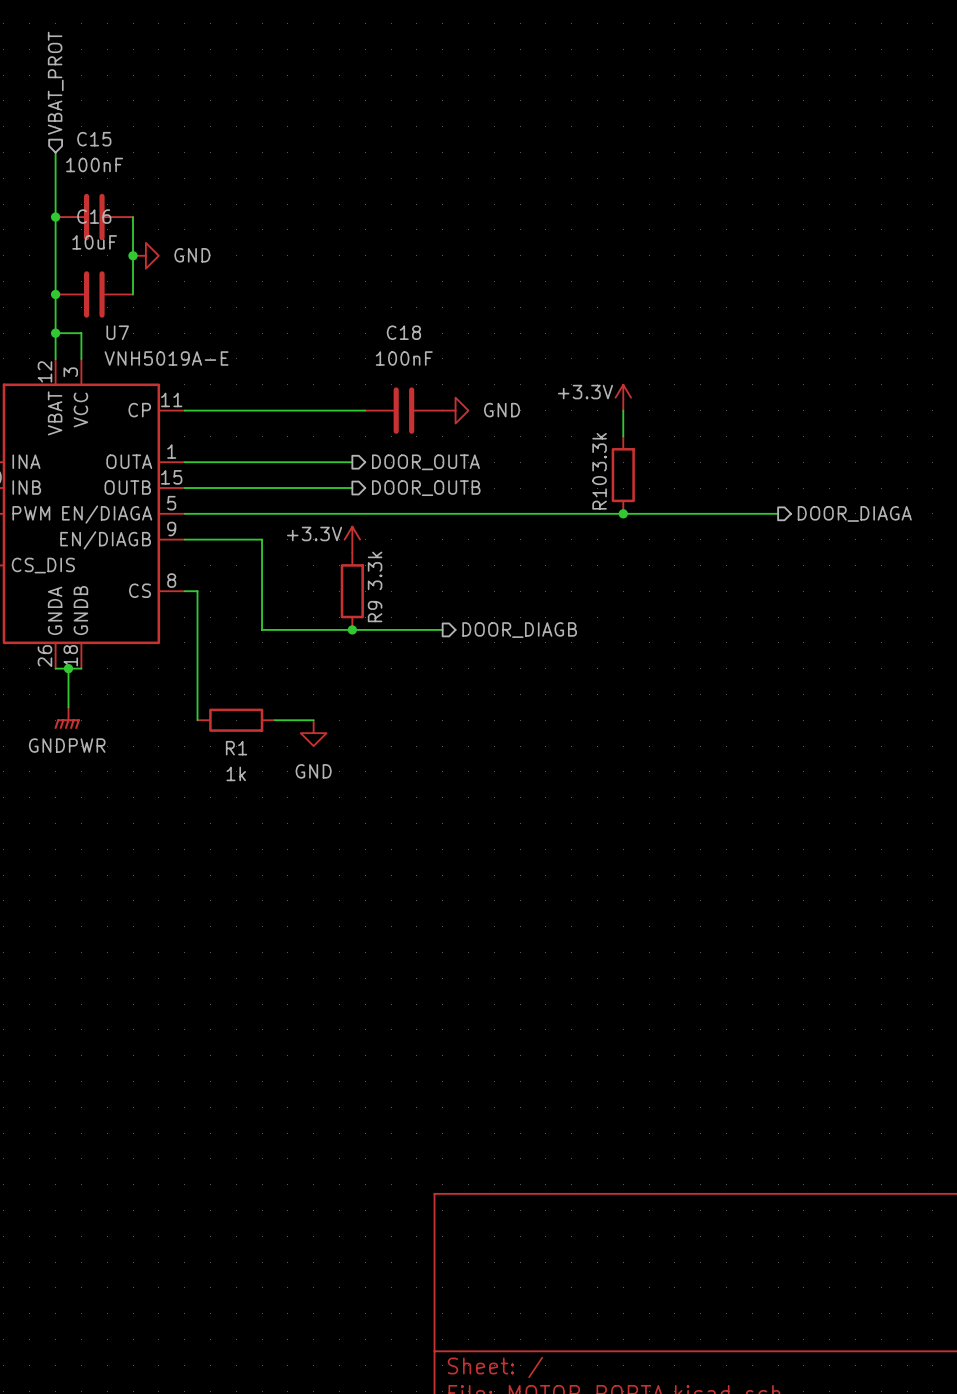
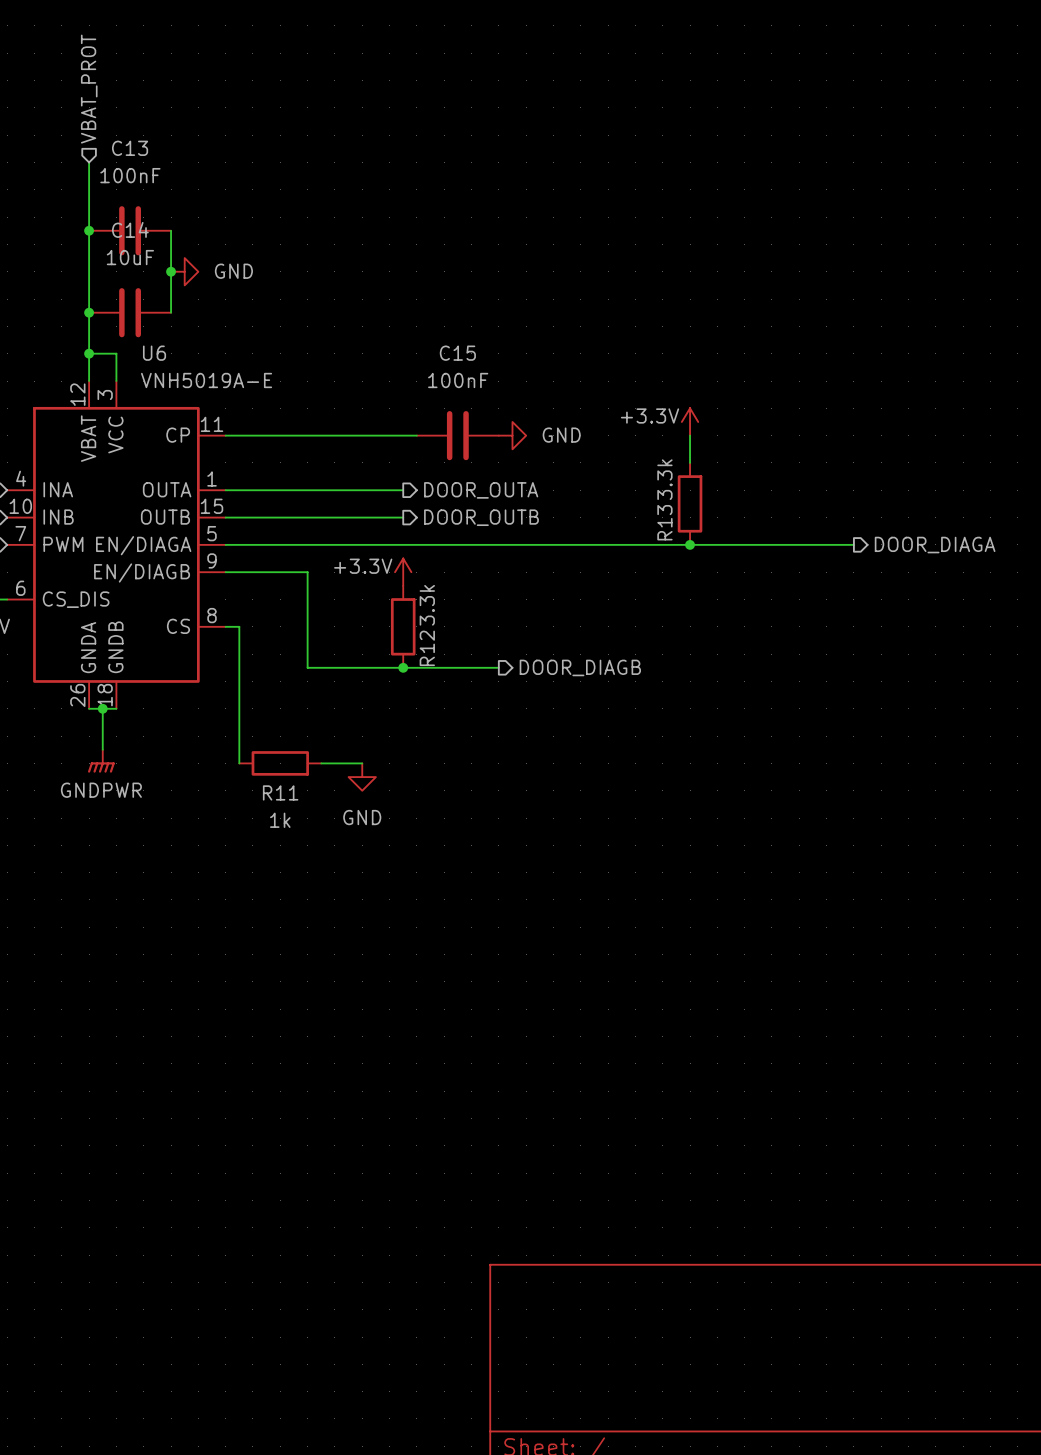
C15 name: C15 (94, 139) -> C13 (130, 148)
C16 name: C16 (94, 216) -> C14 (130, 229)
U7 name: U7 (117, 332) -> U6 (154, 353)
C18 name: C18 (403, 332) -> C15 (457, 353)
R10 name: R10 (599, 492) -> R13 (664, 522)
R9 name: R9 (375, 611) -> R12 (427, 648)
R1 name: R1 (236, 748) -> R11 (280, 792)

